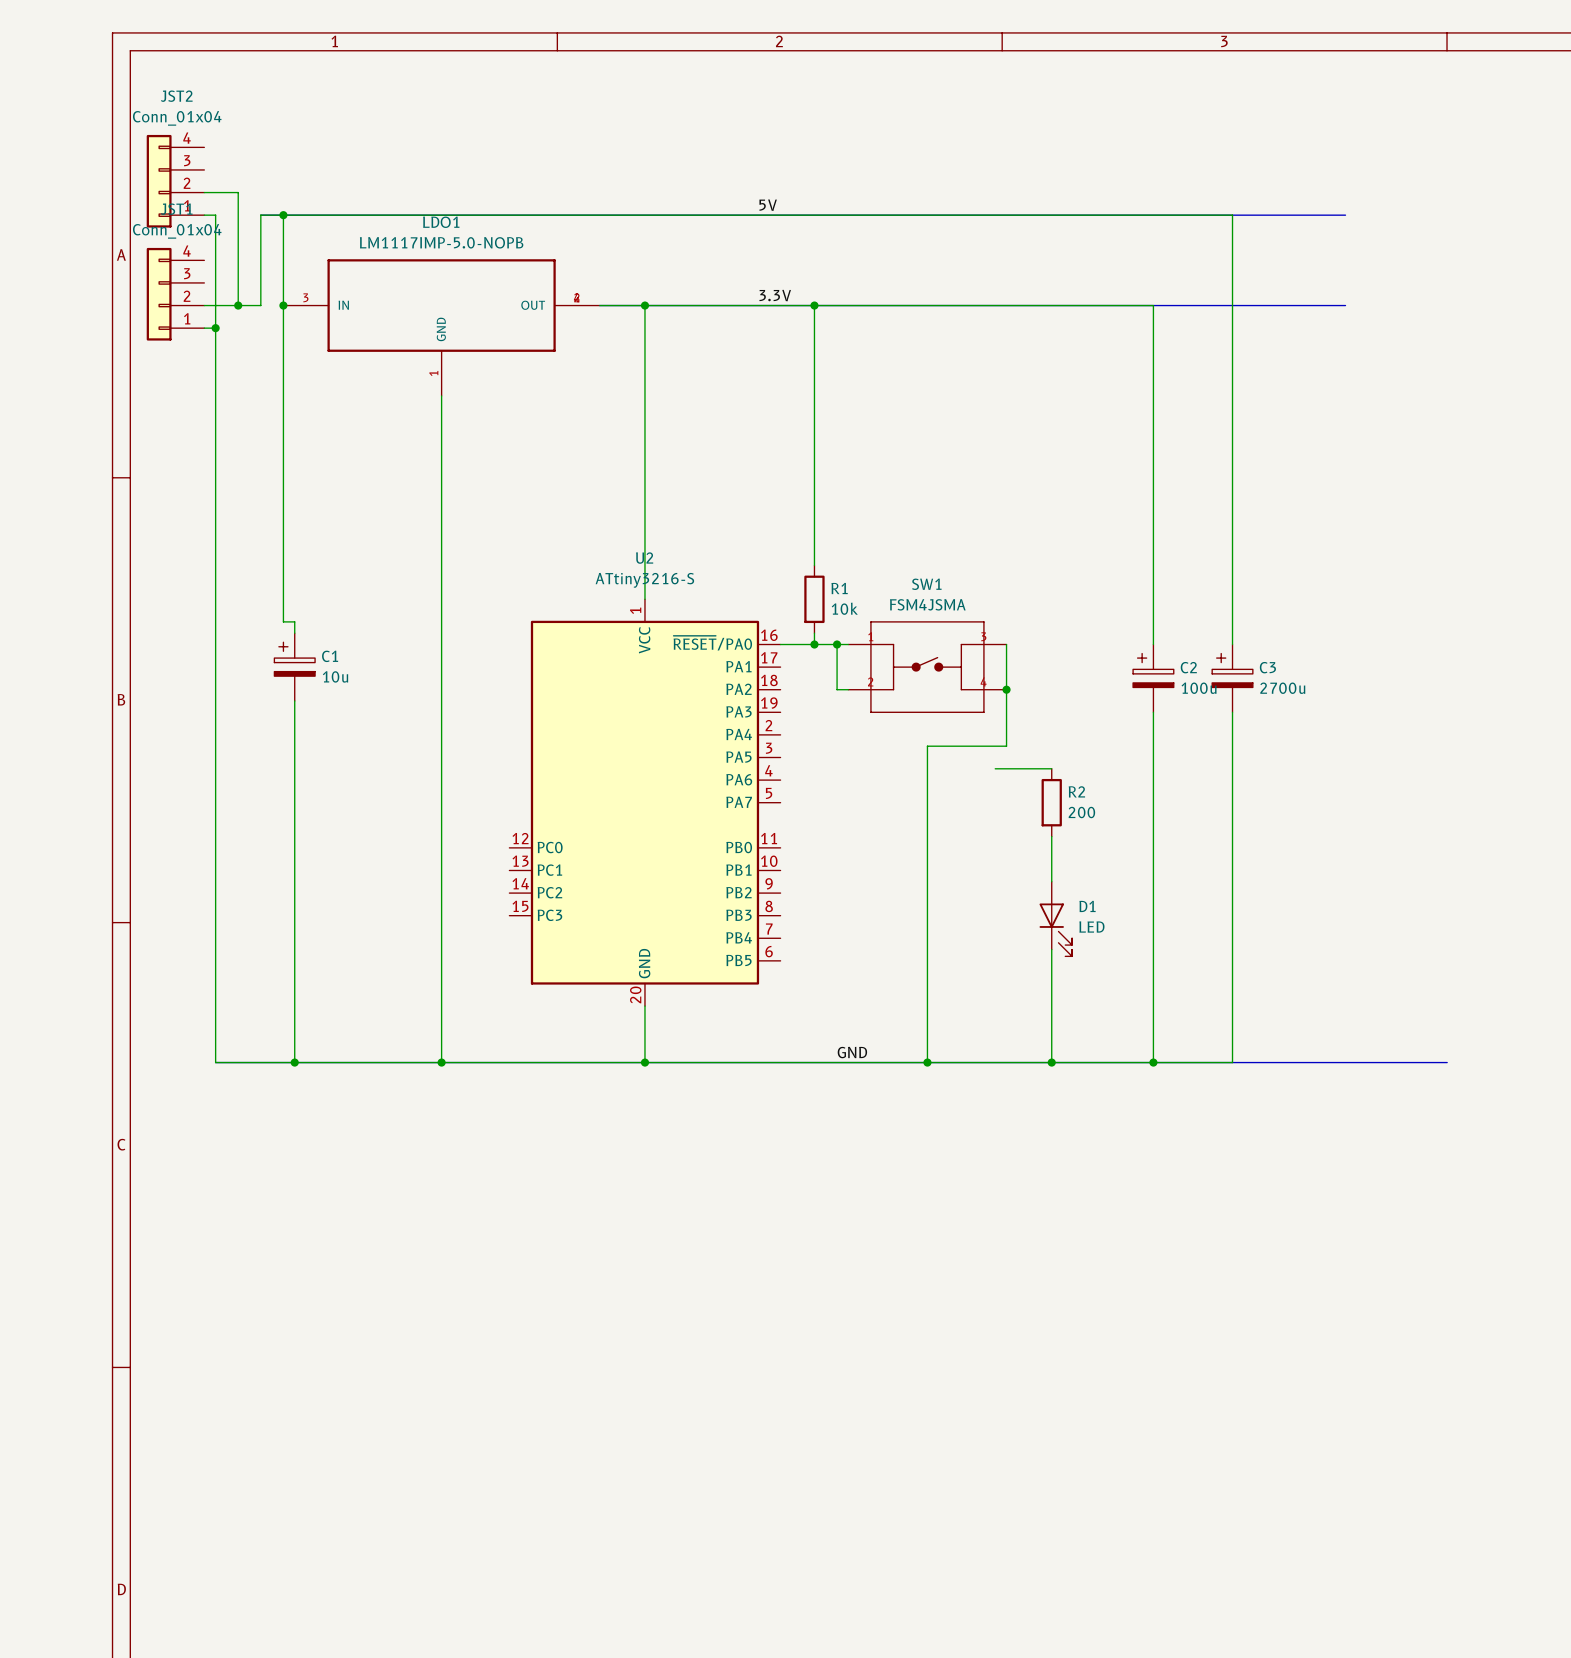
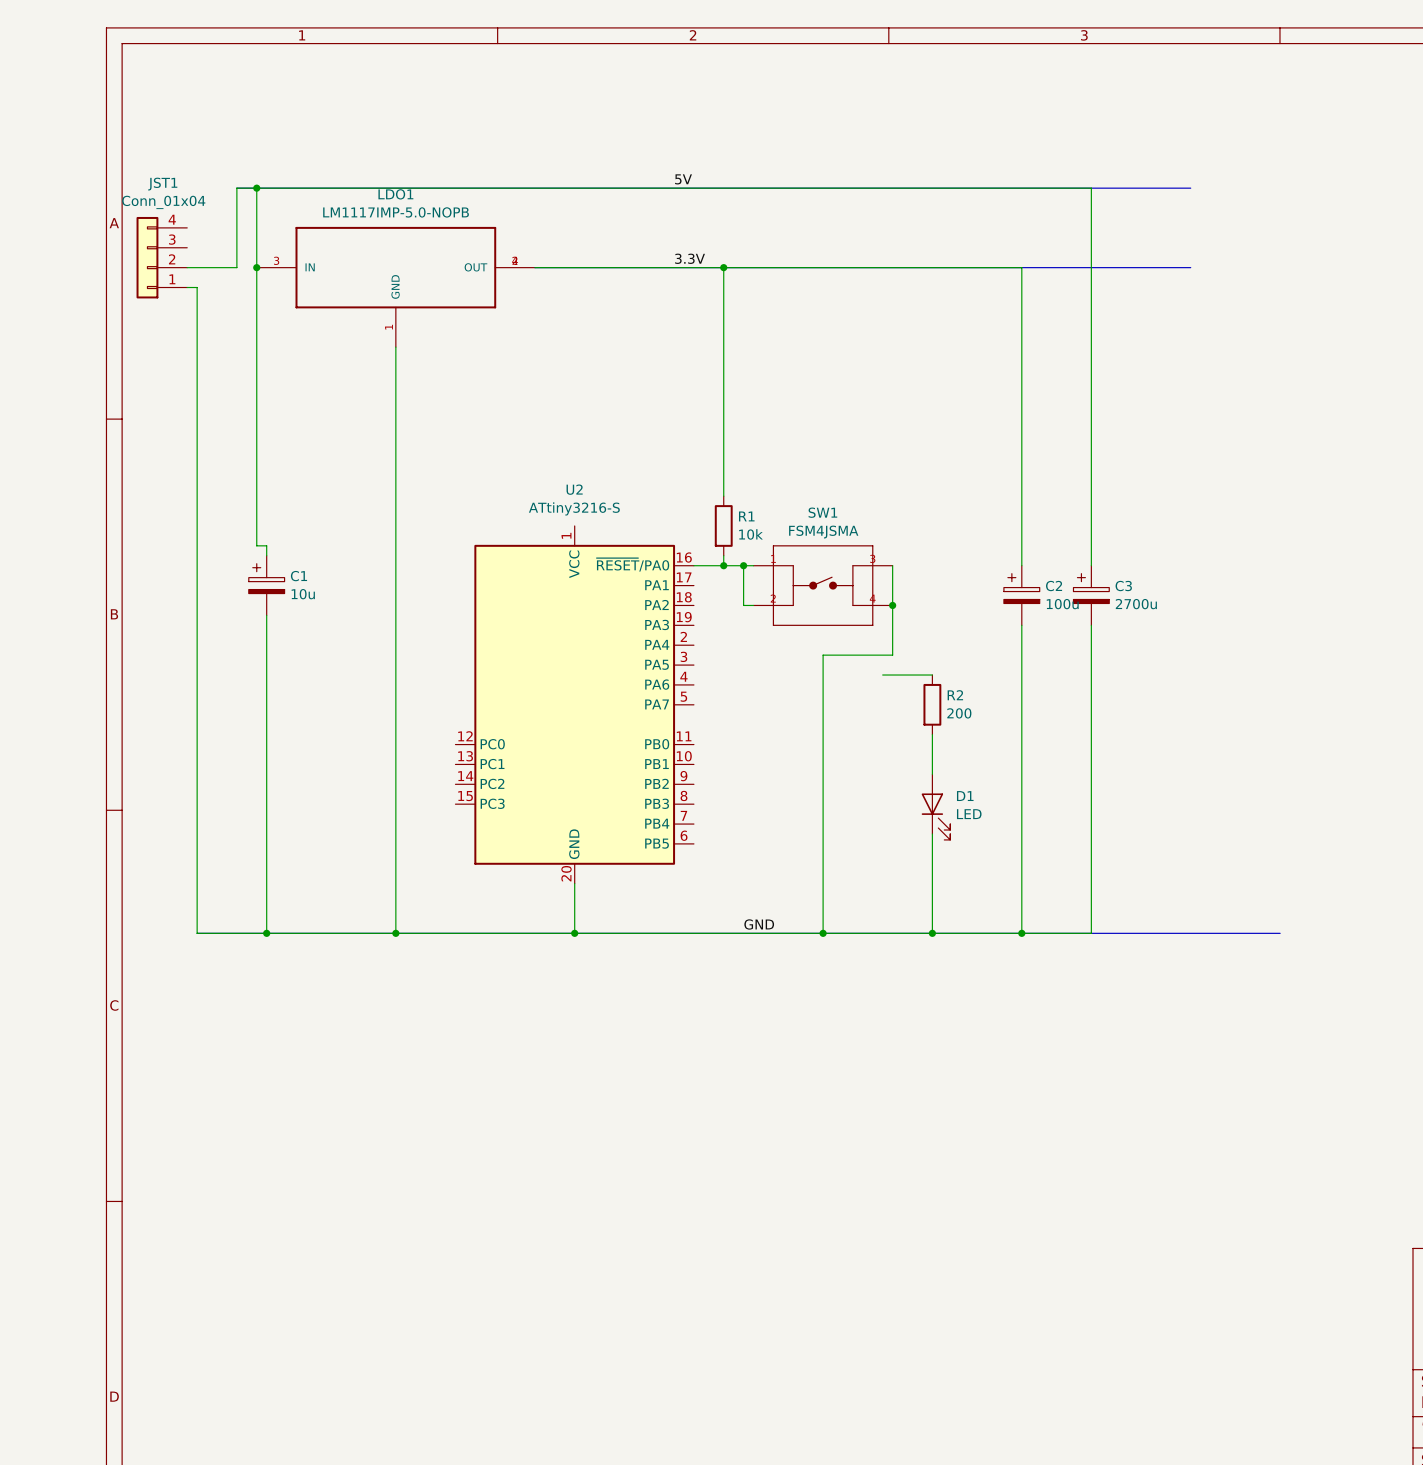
JST2: Conn_01x04 (175, 181) -> none
wire: (204, 192) (238, 192) (238, 305) -> none
wire: (204, 215) (215, 215) (215, 328) -> none
junction: (238, 305) -> none
wire: (644, 305) (644, 599) -> none
junction: (644, 305) -> none
junction: (215, 328) -> none

